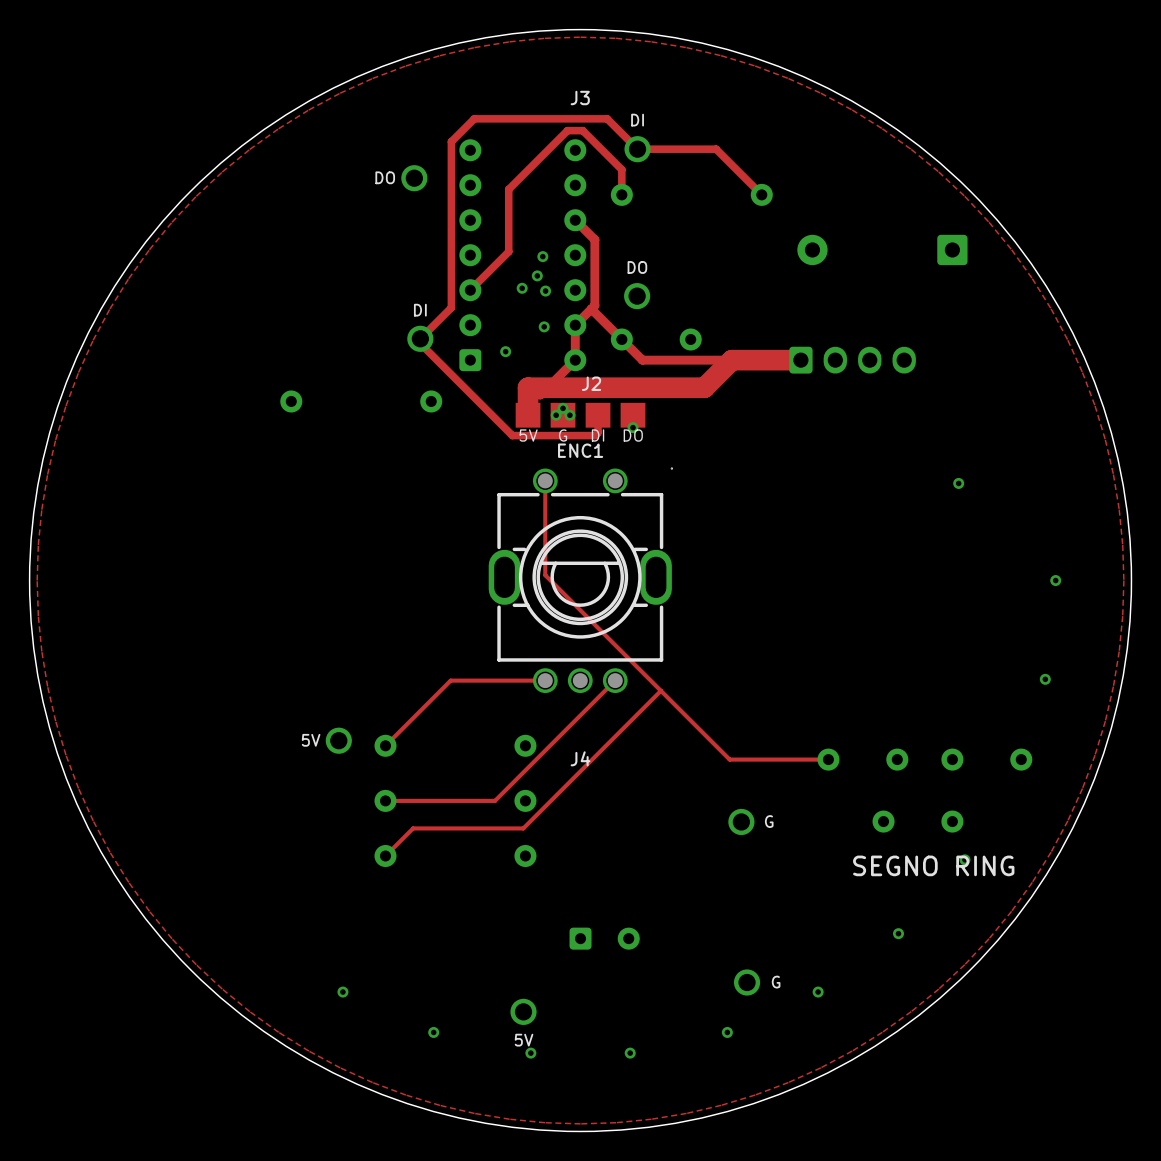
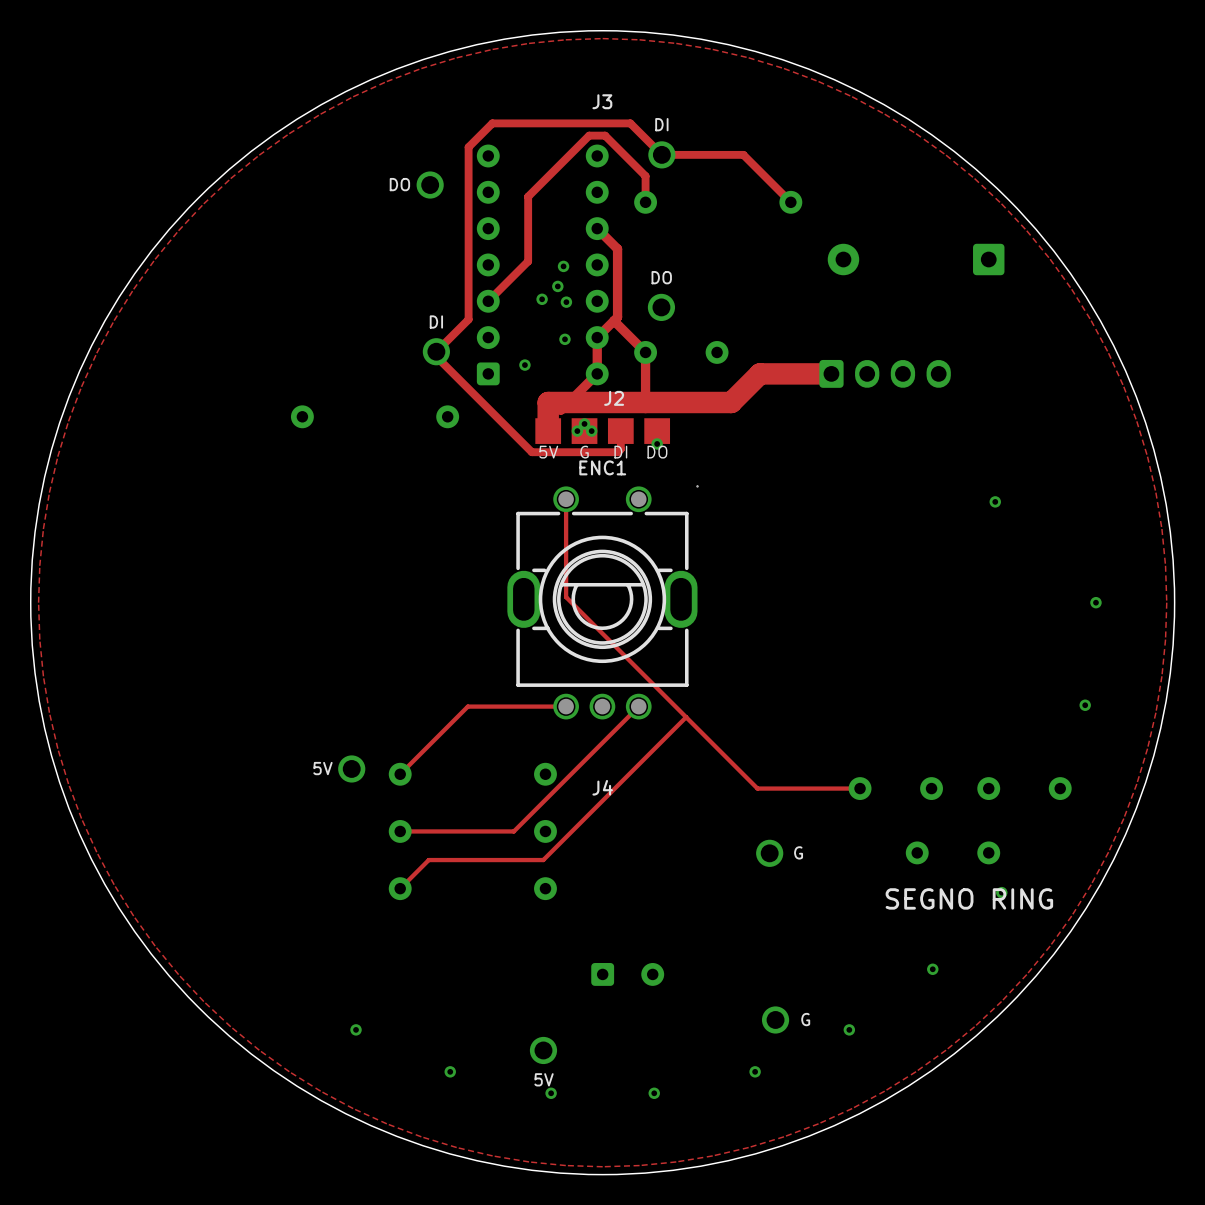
track: (621, 339) (642, 360) (800, 360) -> (645, 352) (645, 402)

